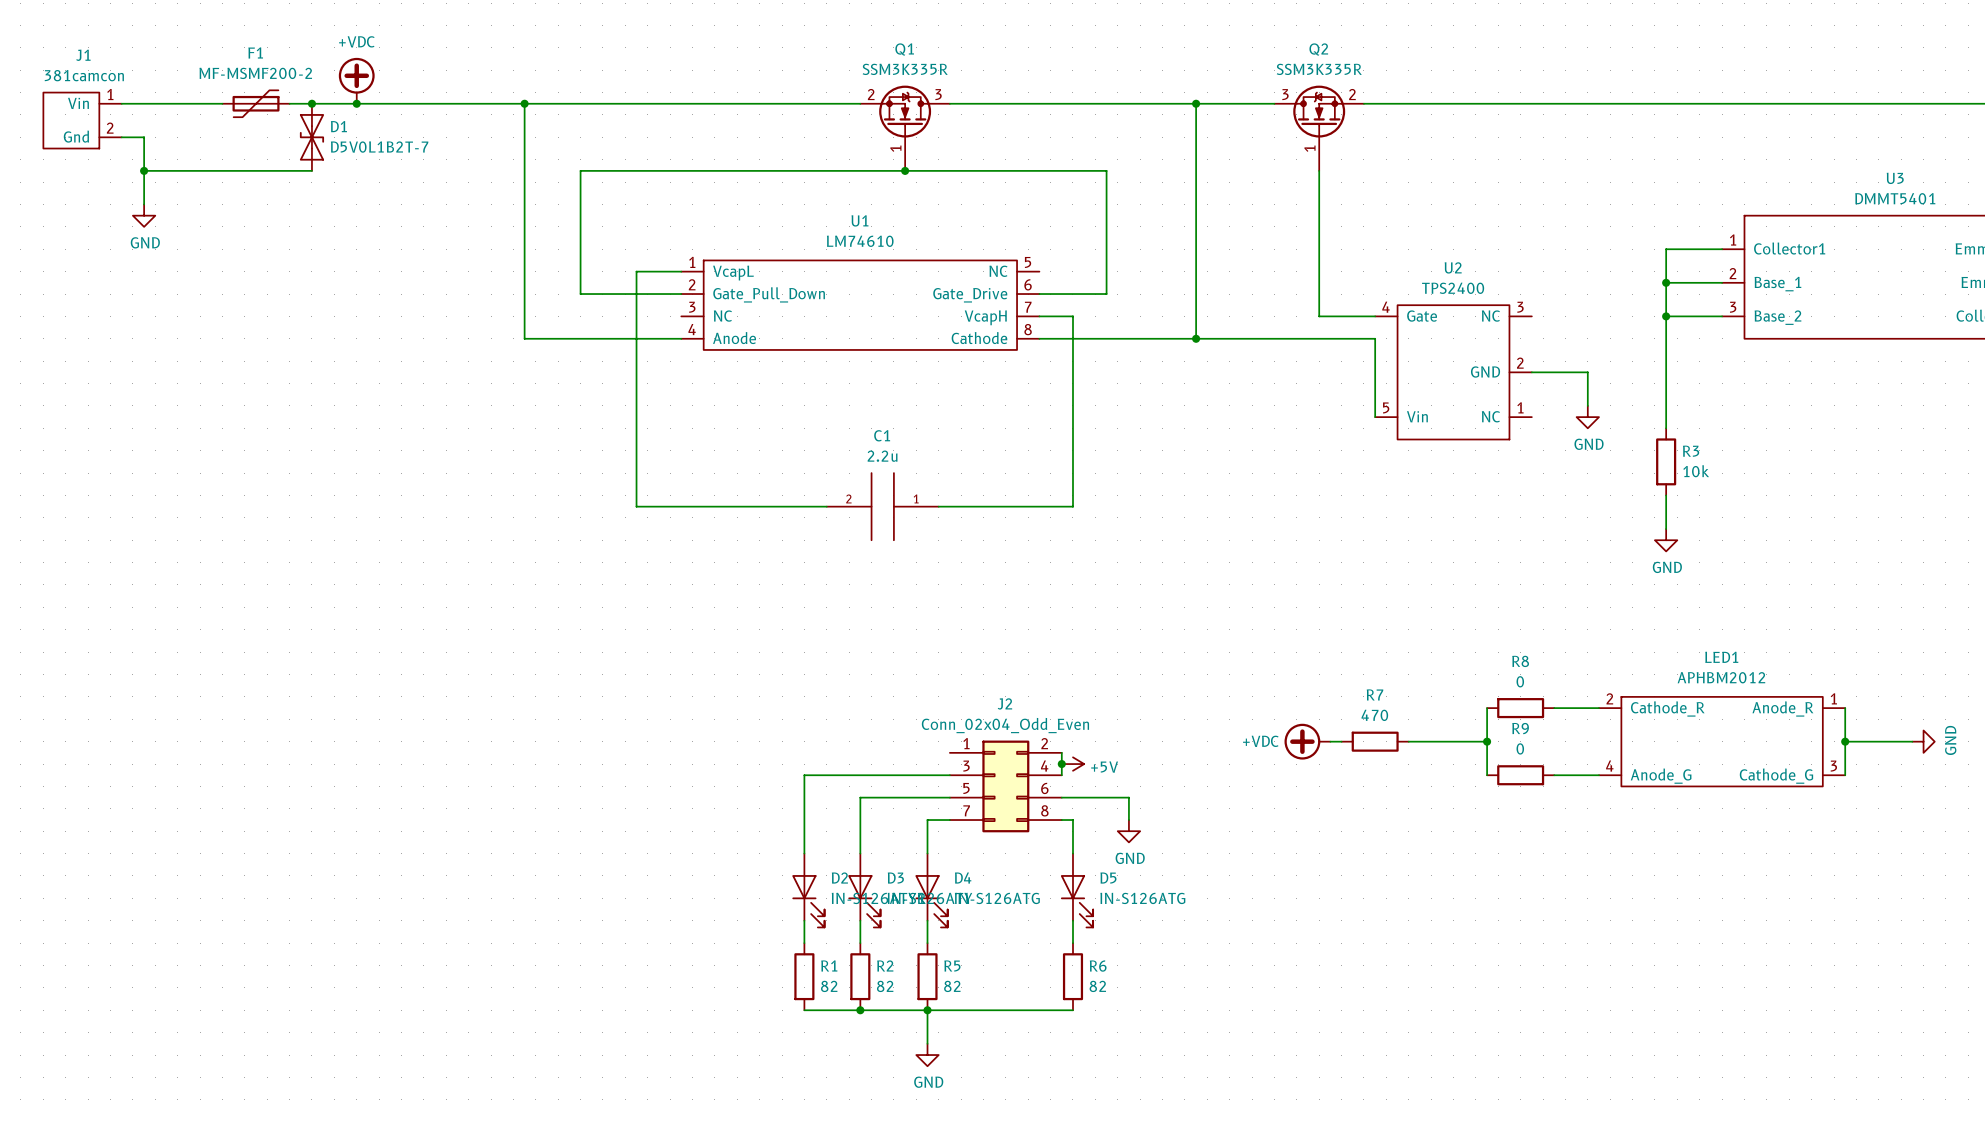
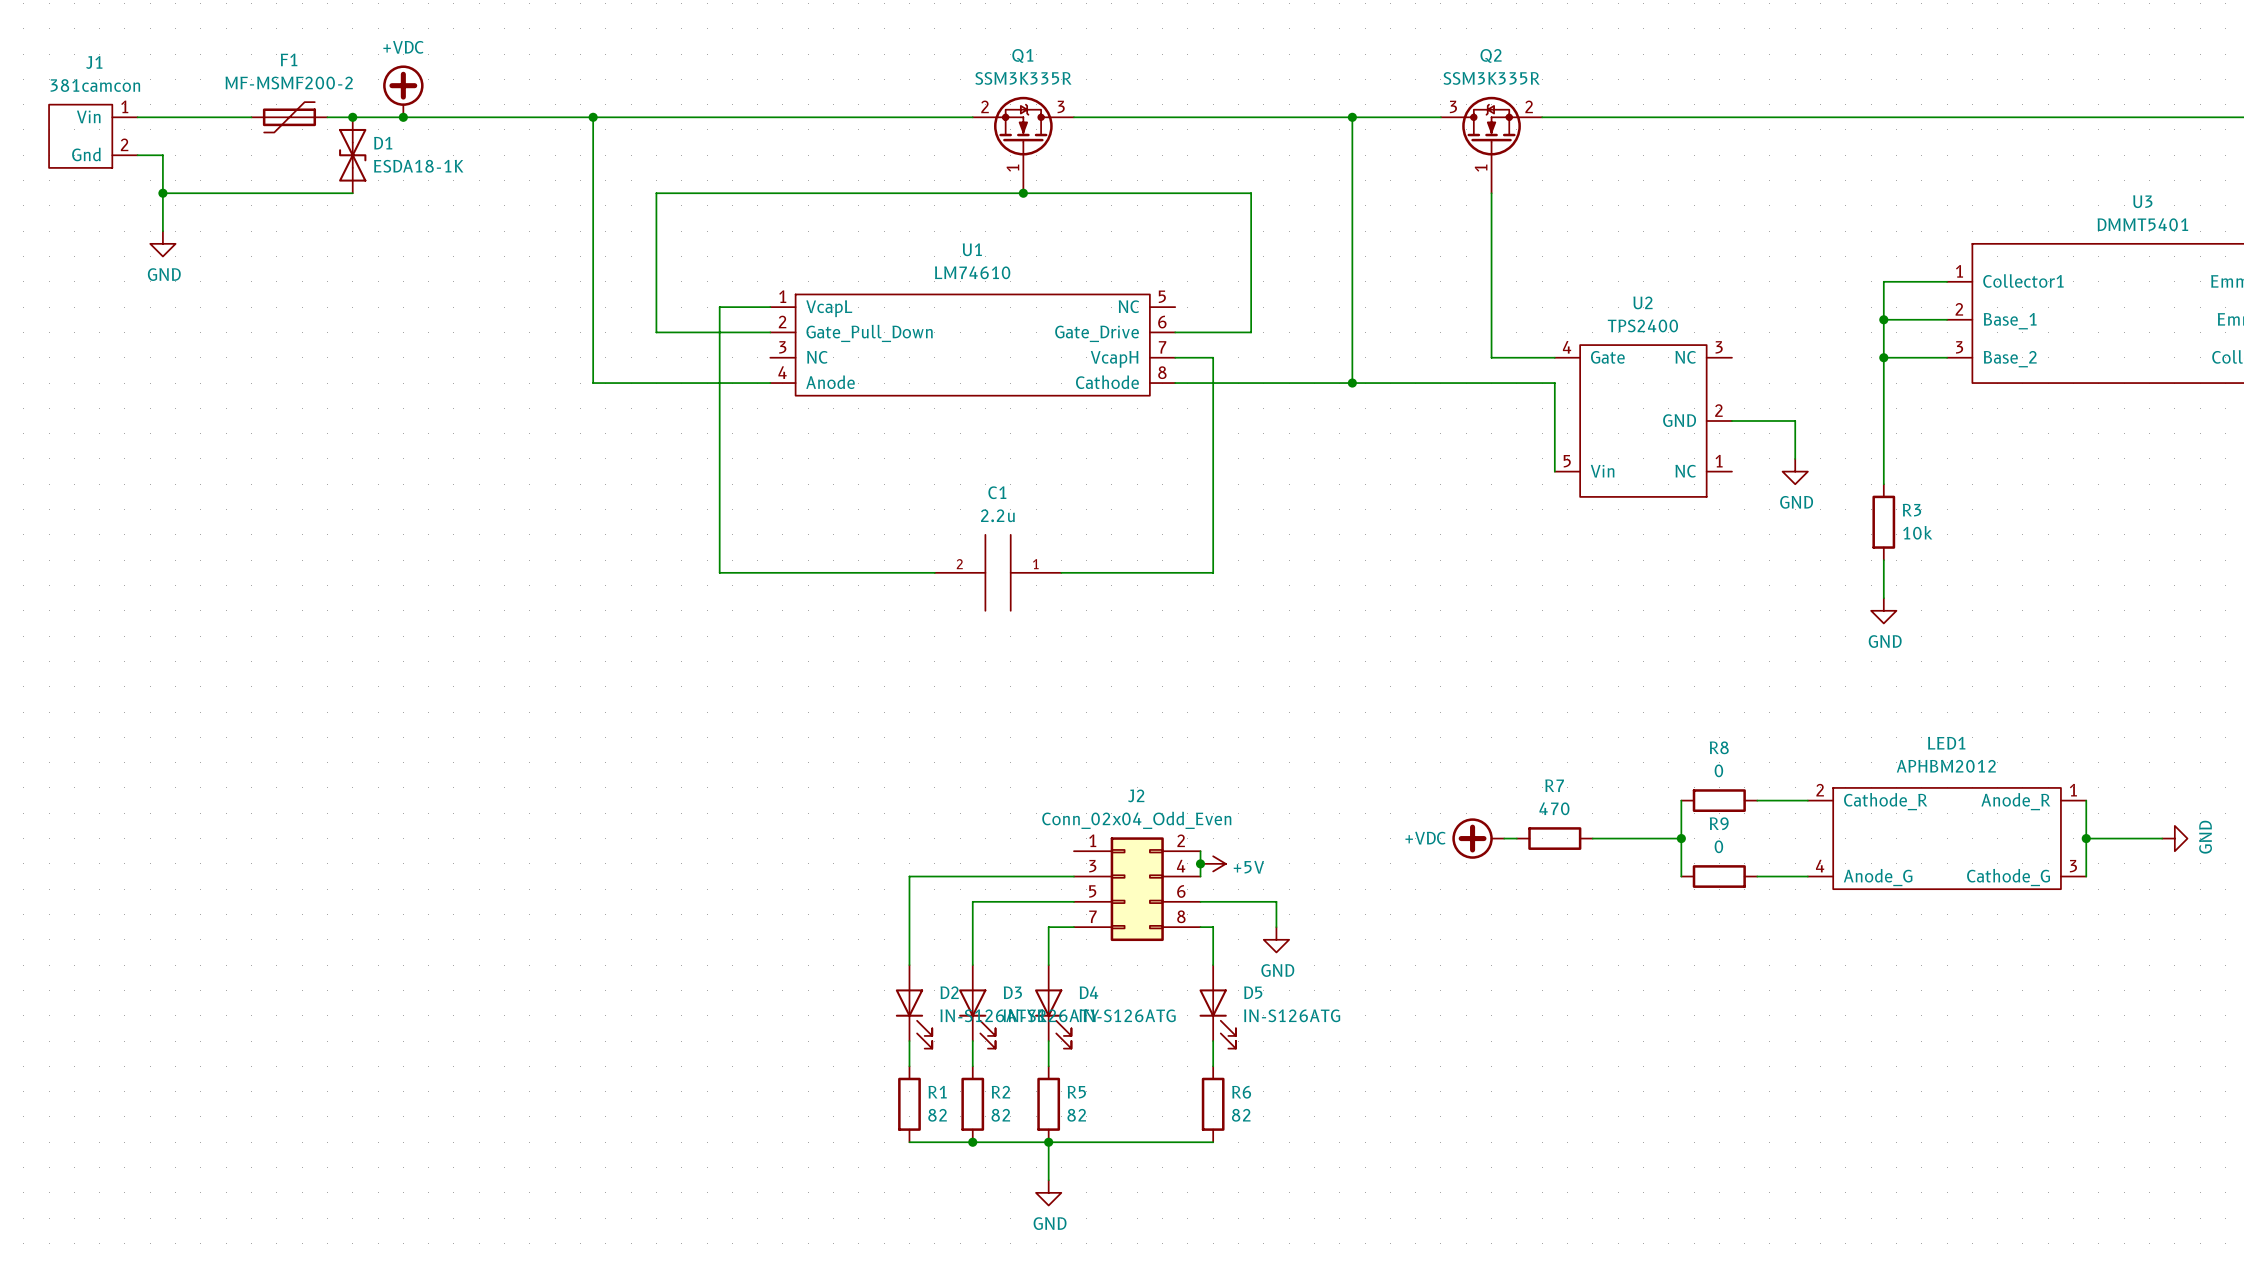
D1 value: D5V0L1B2T-7 (379, 147) -> ESDA18-1K (418, 166)

